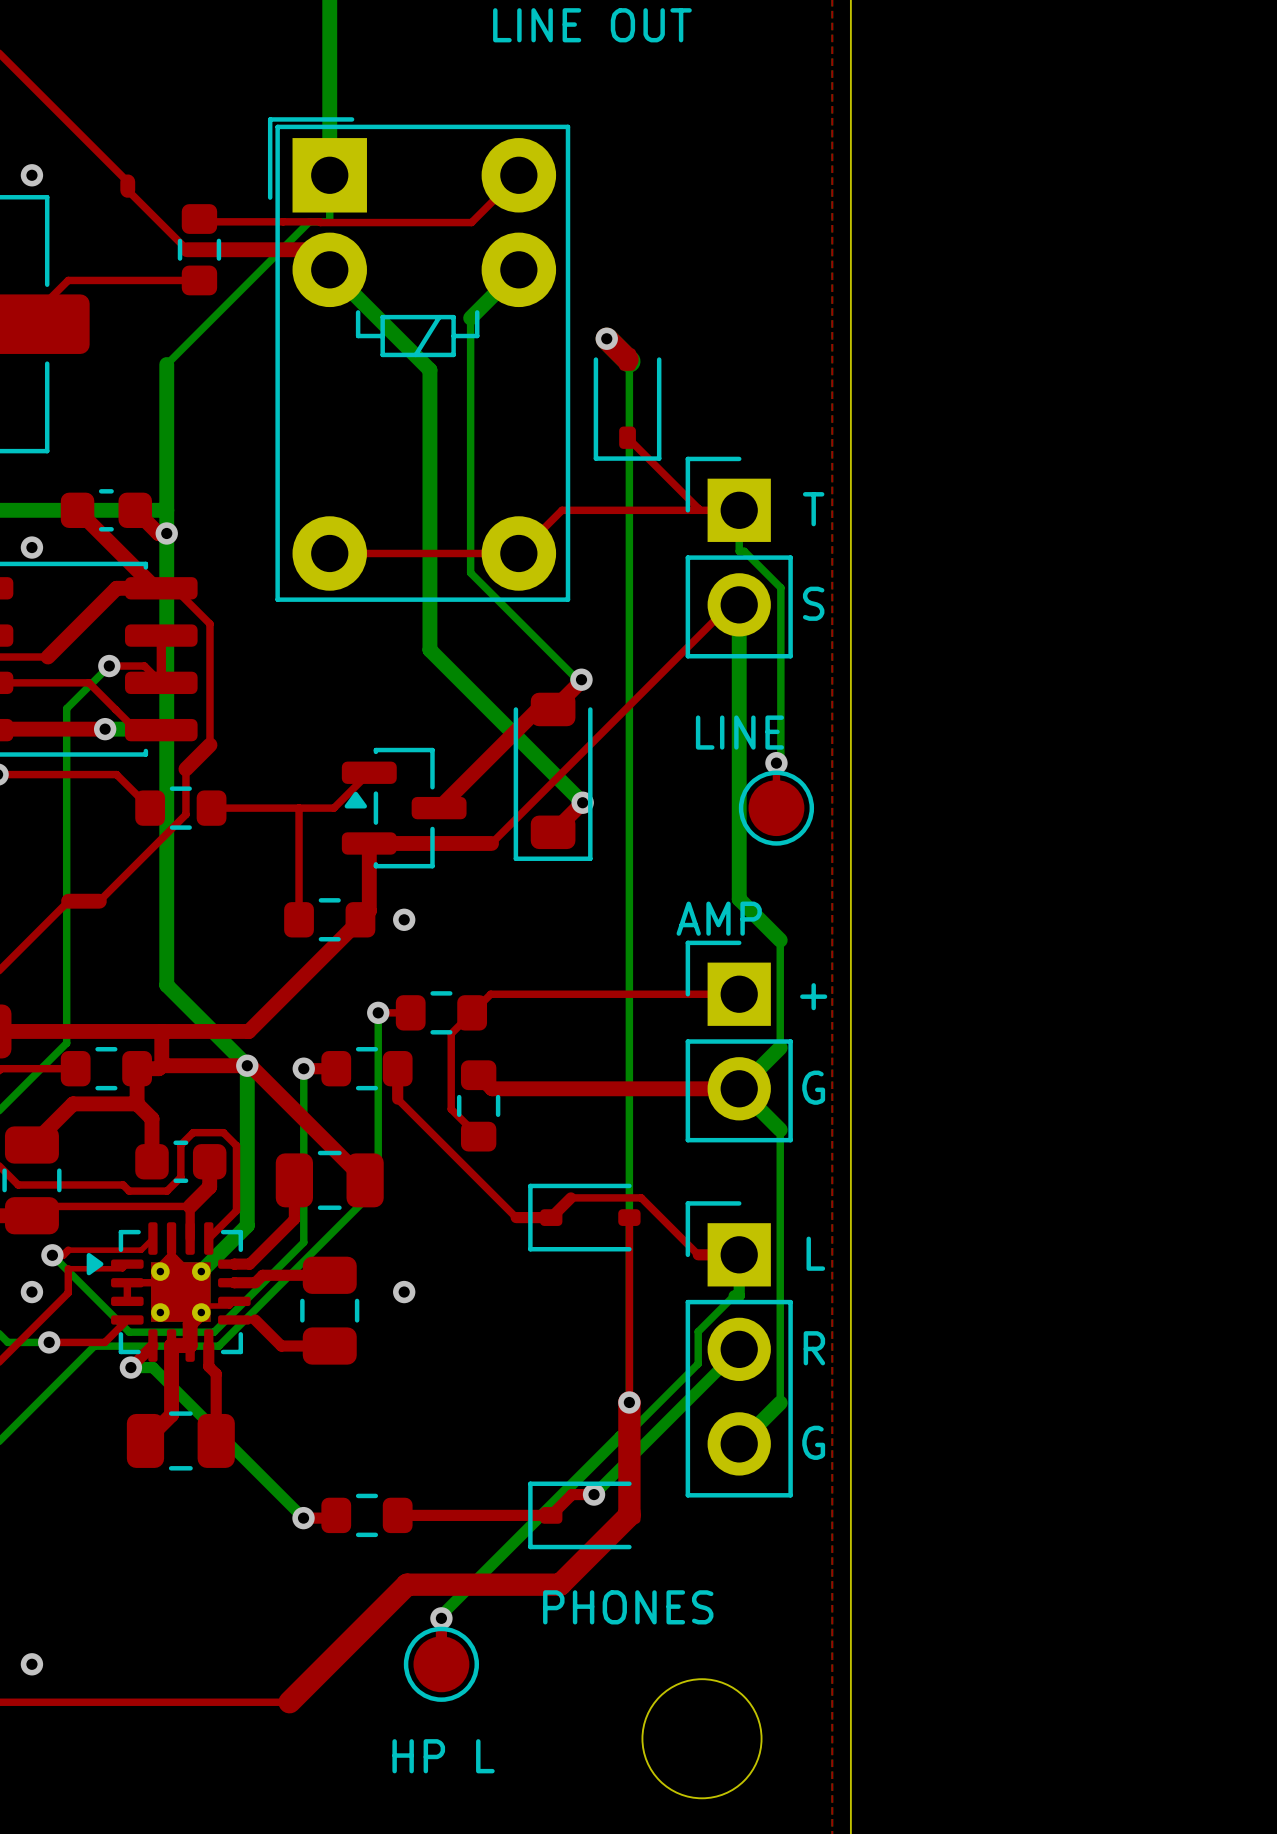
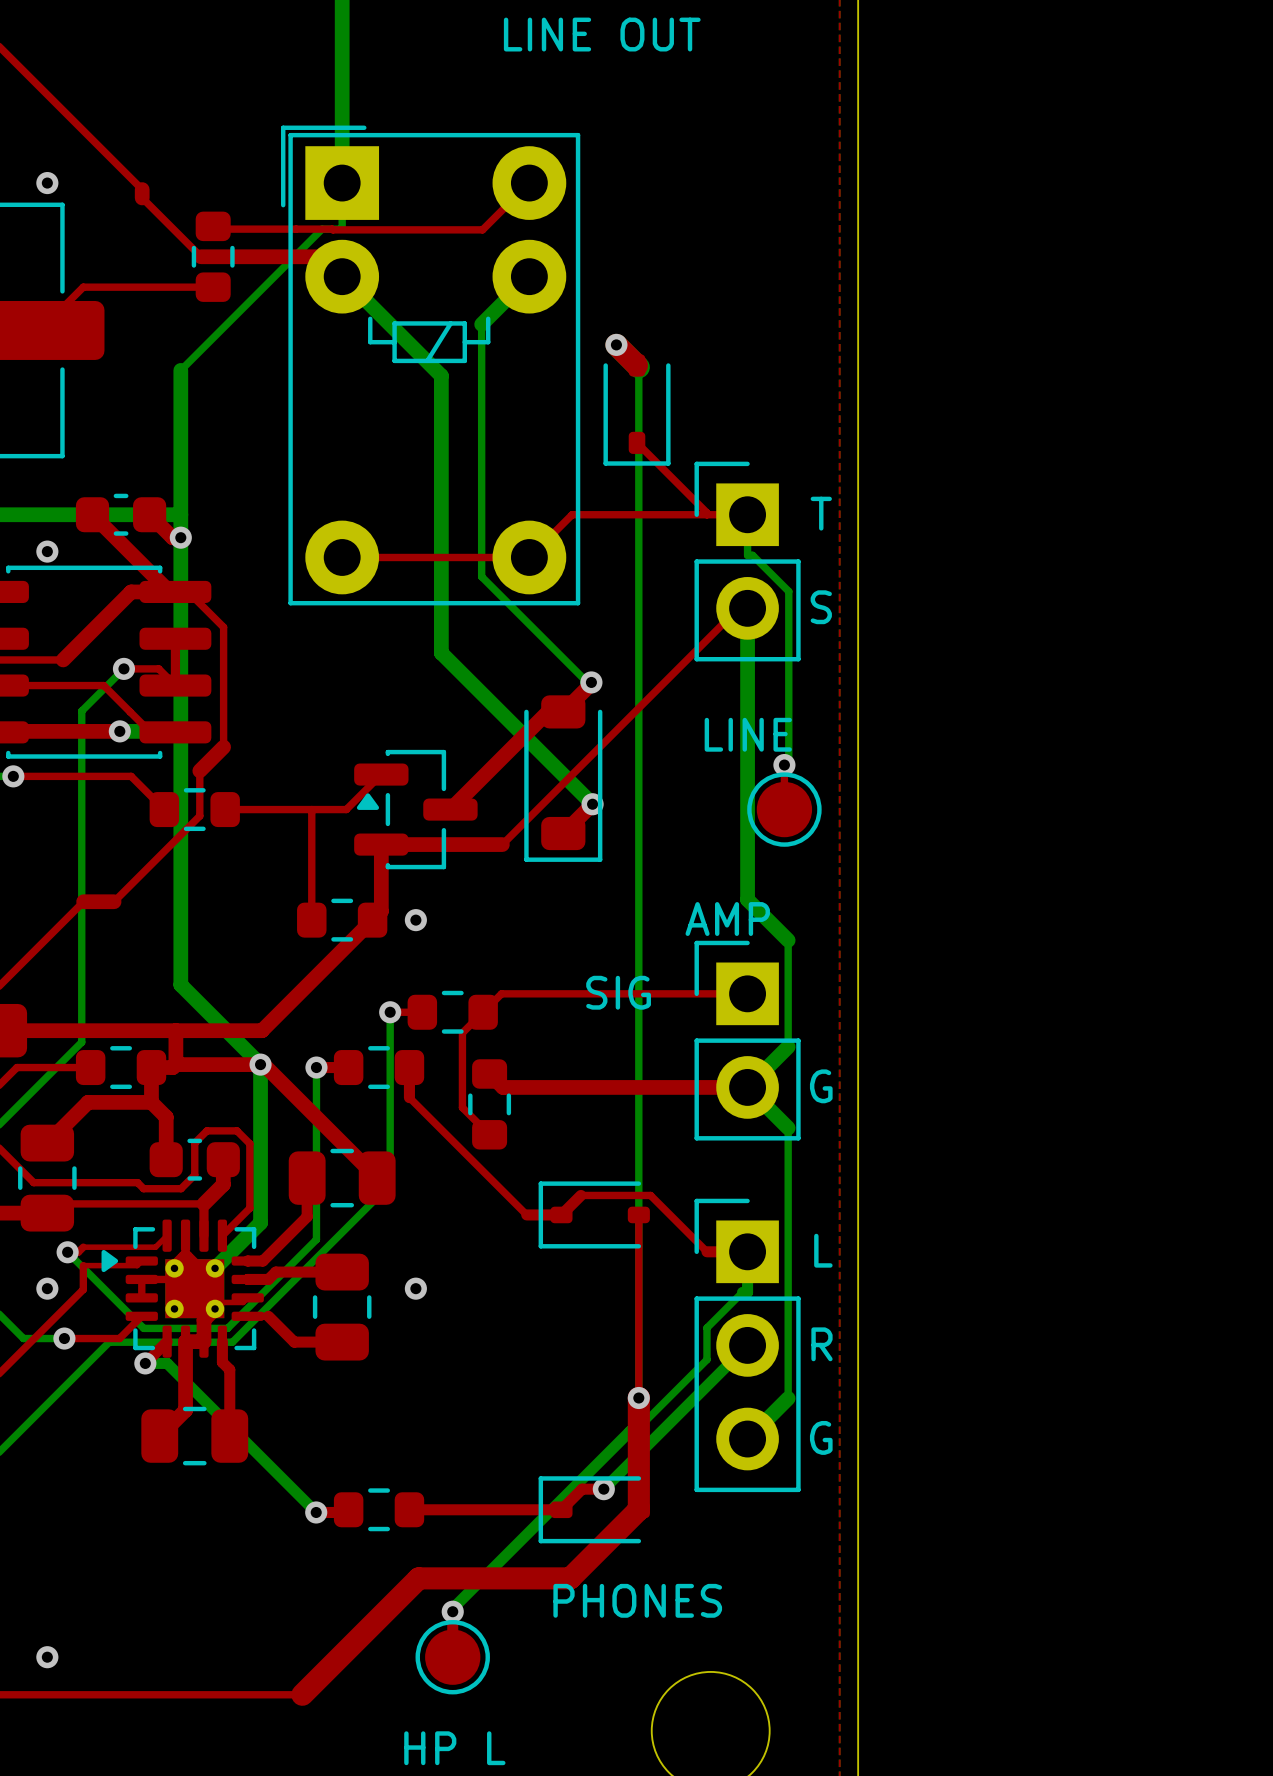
text: none -> SIG (618, 992)
text: + (813, 996) -> none

